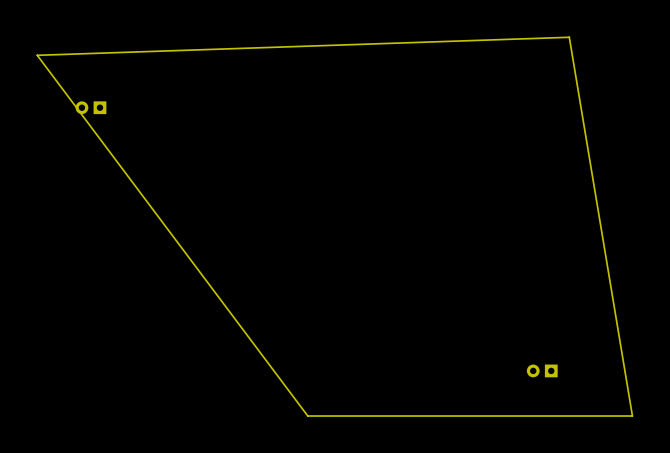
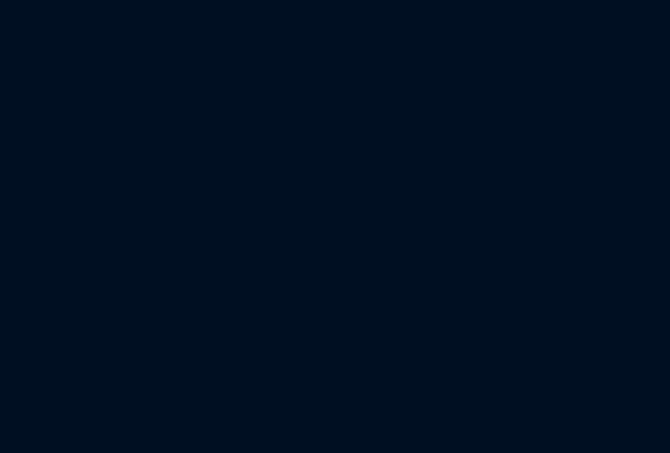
board edge: (569, 37) (632, 416) (307, 416) (37, 55) (569, 37) -> none
part: (90, 107) -> none
part: (542, 370) -> none

